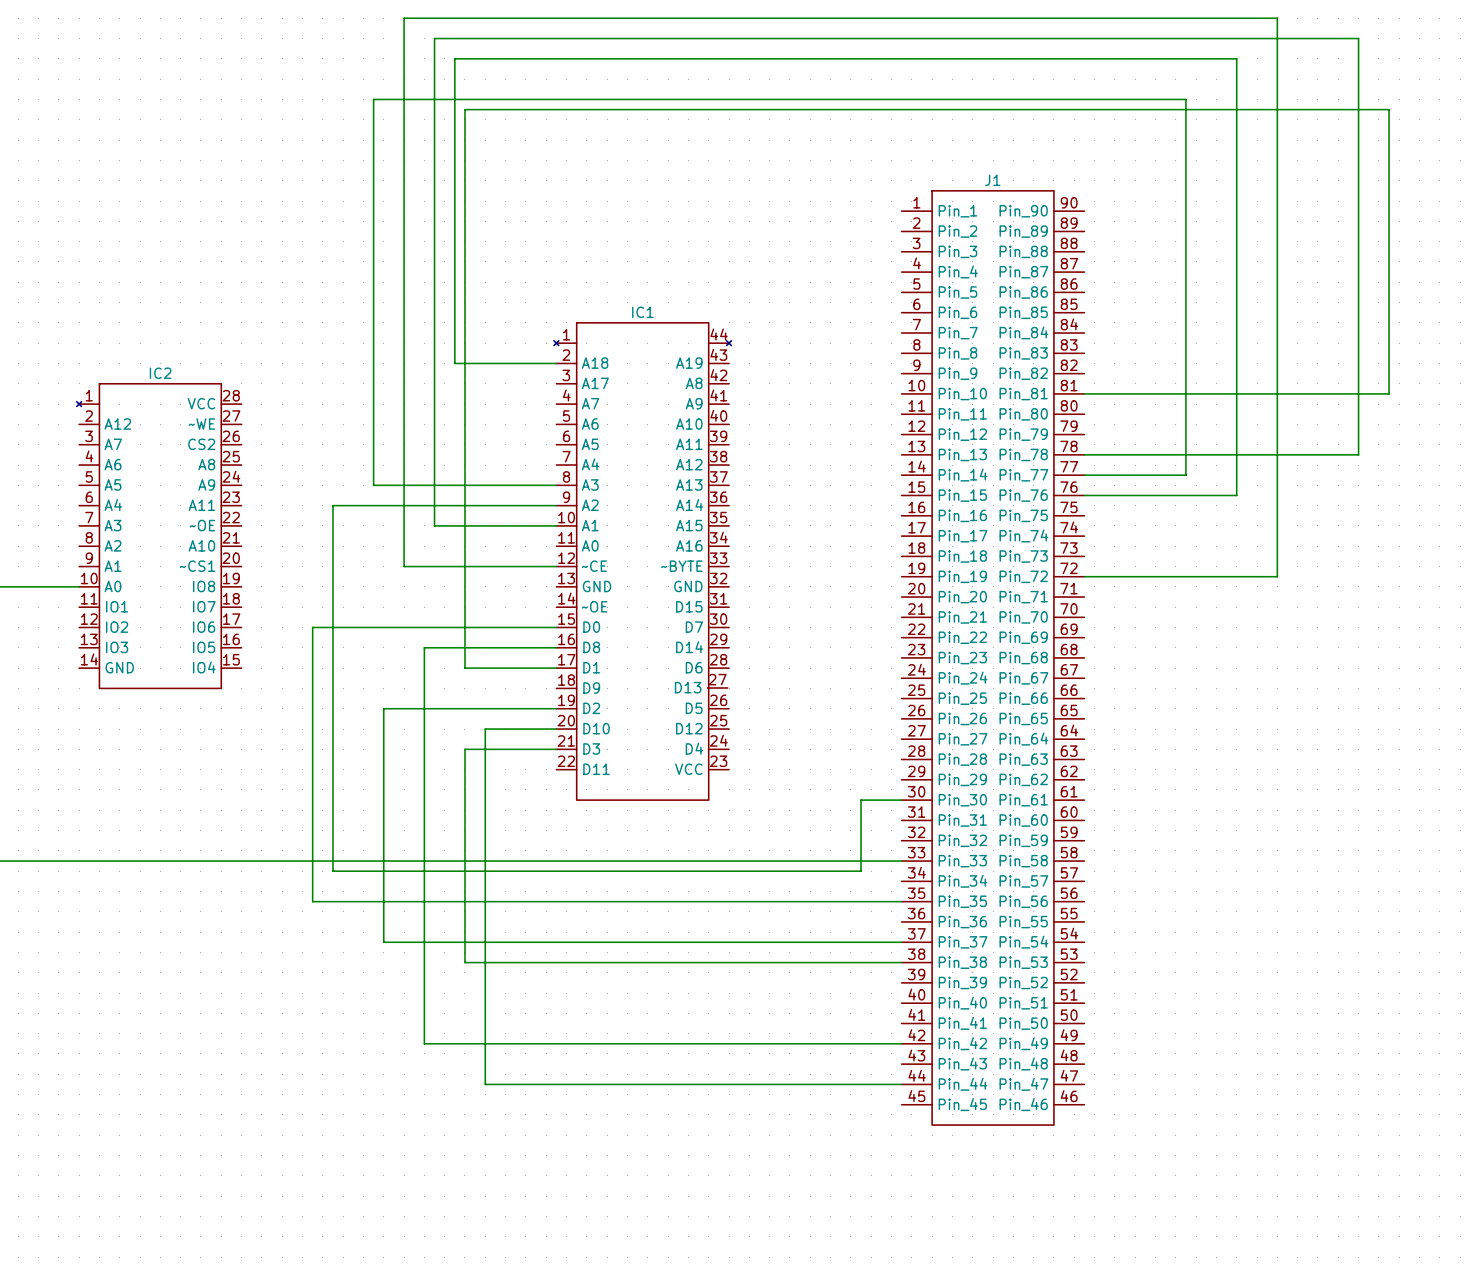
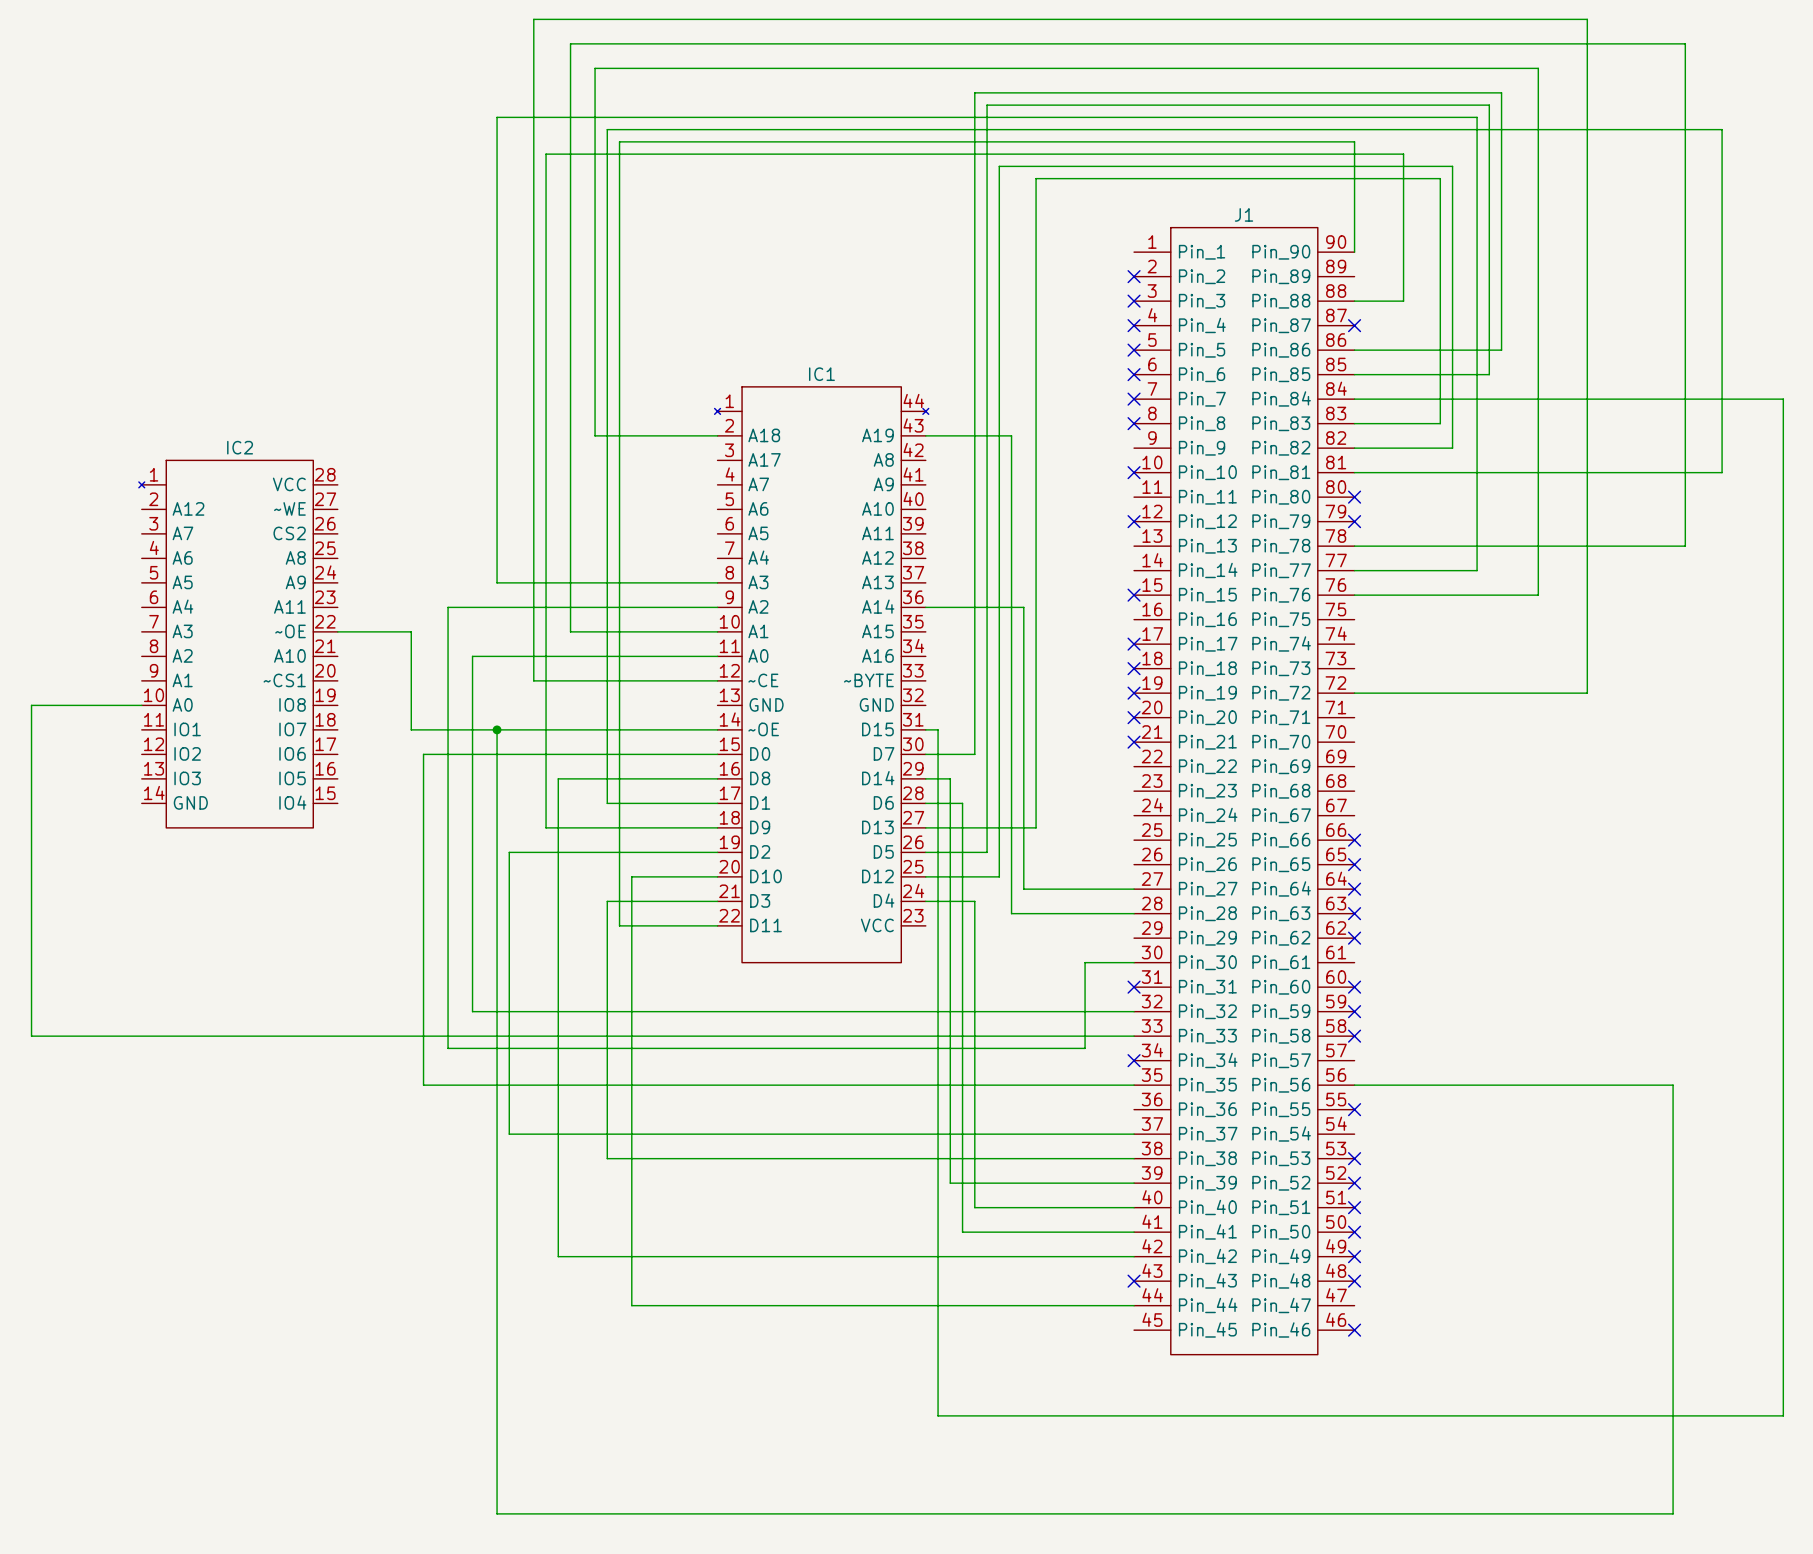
wire: none -> (1354, 252) (1354, 141) (619, 141) (619, 925) (717, 925)
no-connect mark: none -> (1134, 276)
no-connect mark: none -> (1134, 301)
wire: none -> (1354, 301) (1403, 301) (1403, 154) (546, 154) (546, 827) (717, 827)
no-connect mark: none -> (1134, 325)
no-connect mark: none -> (1354, 325)
no-connect mark: none -> (1134, 350)
wire: none -> (1354, 350) (1501, 350) (1501, 92) (974, 92) (974, 754) (925, 754)
no-connect mark: none -> (1134, 374)
wire: none -> (1354, 374) (1489, 374) (1489, 105) (987, 105) (987, 852) (925, 852)
IC1 symbol: [553, 322, 732, 801] -> [714, 386, 929, 963]
no-connect mark: none -> (1134, 399)
wire: none -> (1354, 399) (1783, 399) (1783, 1415) (938, 1415) (938, 729) (925, 729)
no-connect mark: none -> (1134, 423)
wire: none -> (1354, 423) (1440, 423) (1440, 178) (1036, 178) (1036, 827) (925, 827)
wire: none -> (925, 435) (1011, 435) (1011, 913) (1134, 913)
wire: none -> (1354, 448) (1452, 448) (1452, 166) (999, 166) (999, 876) (925, 876)
no-connect mark: none -> (1134, 472)
no-connect mark: none -> (1354, 497)
no-connect mark: none -> (1134, 521)
no-connect mark: none -> (1354, 521)
no-connect mark: none -> (1134, 595)
wire: none -> (925, 607) (1023, 607) (1023, 889) (1134, 889)
wire: none -> (337, 631) (411, 631) (411, 729) (717, 729)
no-connect mark: none -> (1134, 644)
wire: none -> (717, 656) (472, 656) (472, 1011) (1134, 1011)
no-connect mark: none -> (1134, 668)
no-connect mark: none -> (1134, 693)
no-connect mark: none -> (1134, 717)
wire: none -> (497, 729) (497, 1513) (1673, 1513) (1673, 1085) (1354, 1085)
junction: none -> (497, 729)
no-connect mark: none -> (1134, 742)
wire: none -> (925, 778) (950, 778) (950, 1183) (1134, 1183)
wire: none -> (925, 803) (962, 803) (962, 1232) (1134, 1232)
no-connect mark: none -> (1354, 840)
no-connect mark: none -> (1354, 864)
no-connect mark: none -> (1354, 889)
wire: none -> (925, 901) (974, 901) (974, 1207) (1134, 1207)
no-connect mark: none -> (1354, 913)
no-connect mark: none -> (1354, 938)
no-connect mark: none -> (1134, 987)
no-connect mark: none -> (1354, 987)
no-connect mark: none -> (1354, 1011)
no-connect mark: none -> (1354, 1036)
no-connect mark: none -> (1134, 1060)
no-connect mark: none -> (1354, 1109)
no-connect mark: none -> (1354, 1158)
no-connect mark: none -> (1354, 1183)
no-connect mark: none -> (1354, 1207)
no-connect mark: none -> (1354, 1232)
no-connect mark: none -> (1354, 1256)
no-connect mark: none -> (1134, 1281)
no-connect mark: none -> (1354, 1281)
no-connect mark: none -> (1354, 1330)

